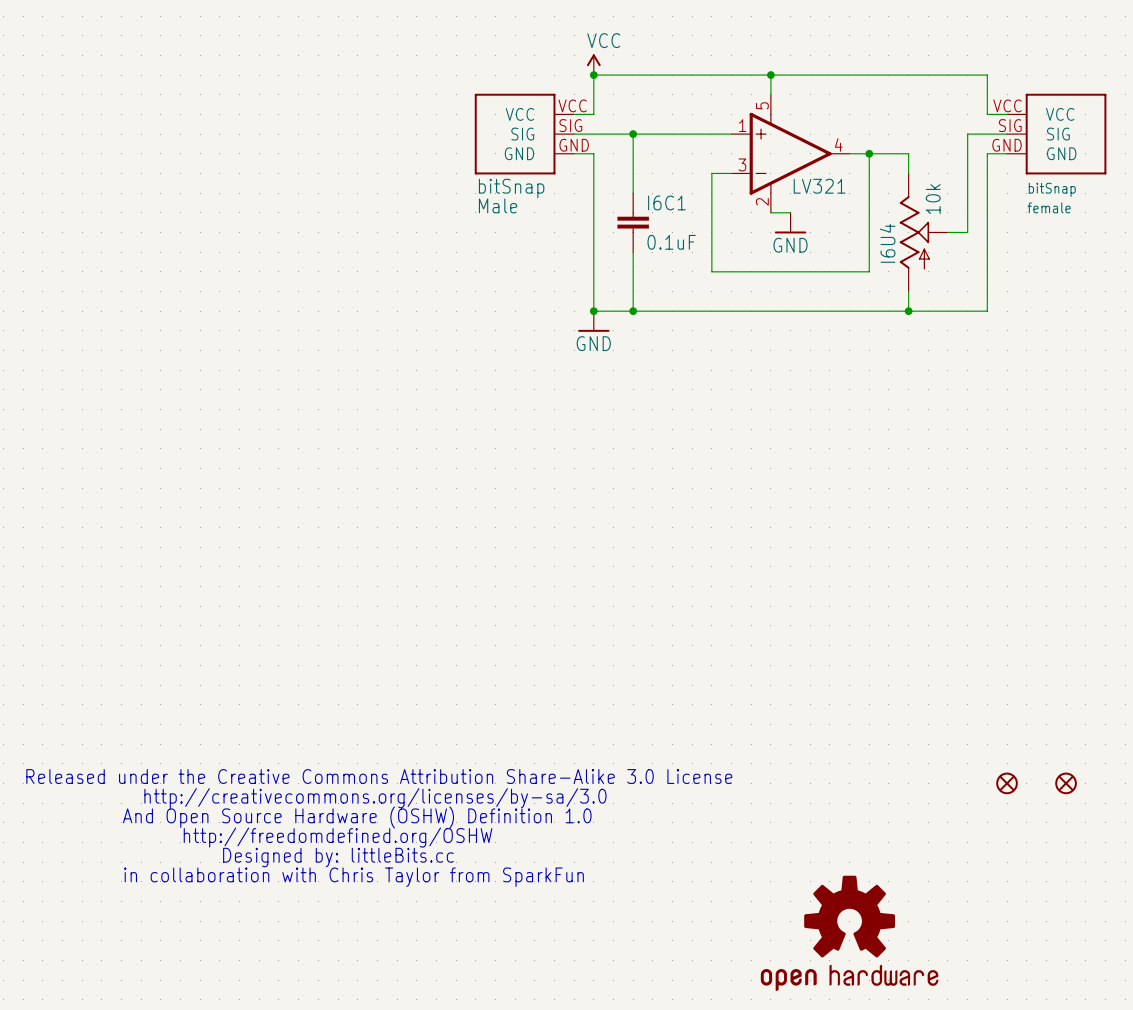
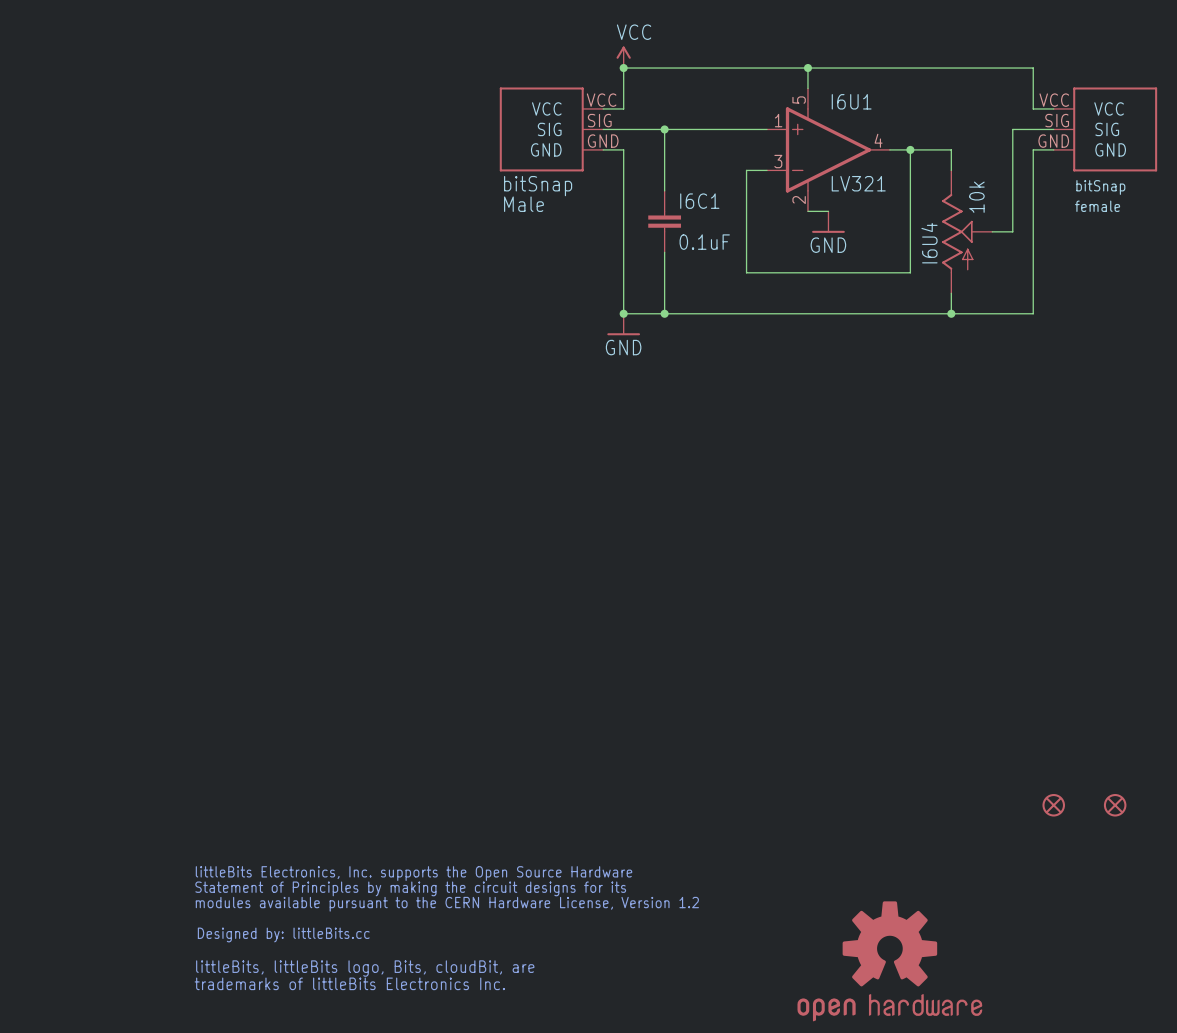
I6U1 name: none -> I6U1 (851, 101)
part: (379, 828) -> none
part: none -> (446, 928)

